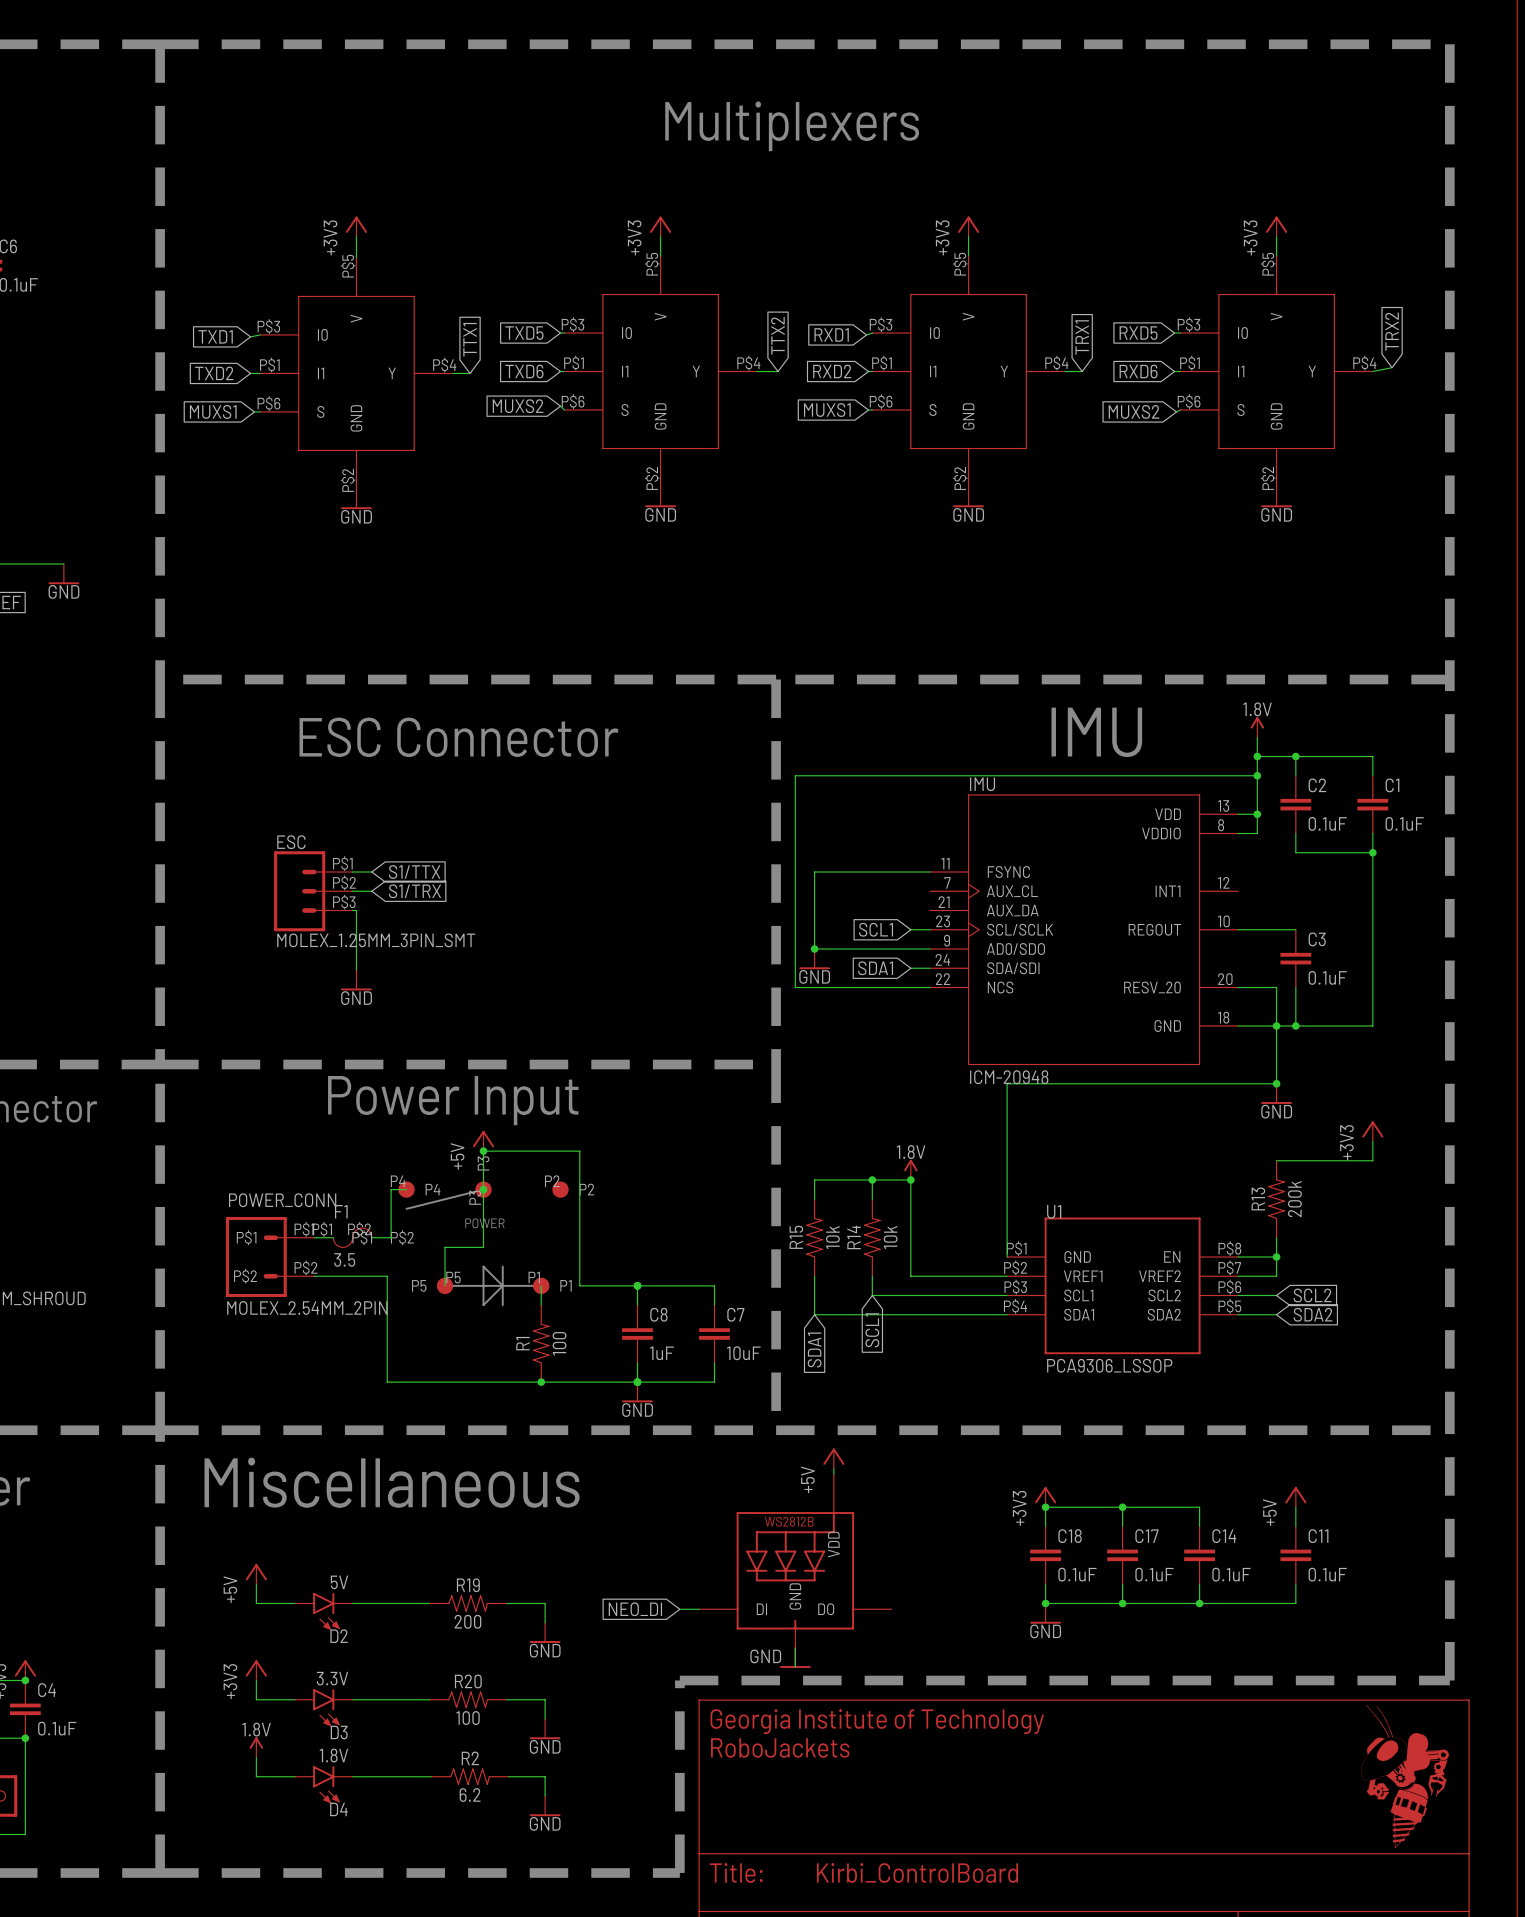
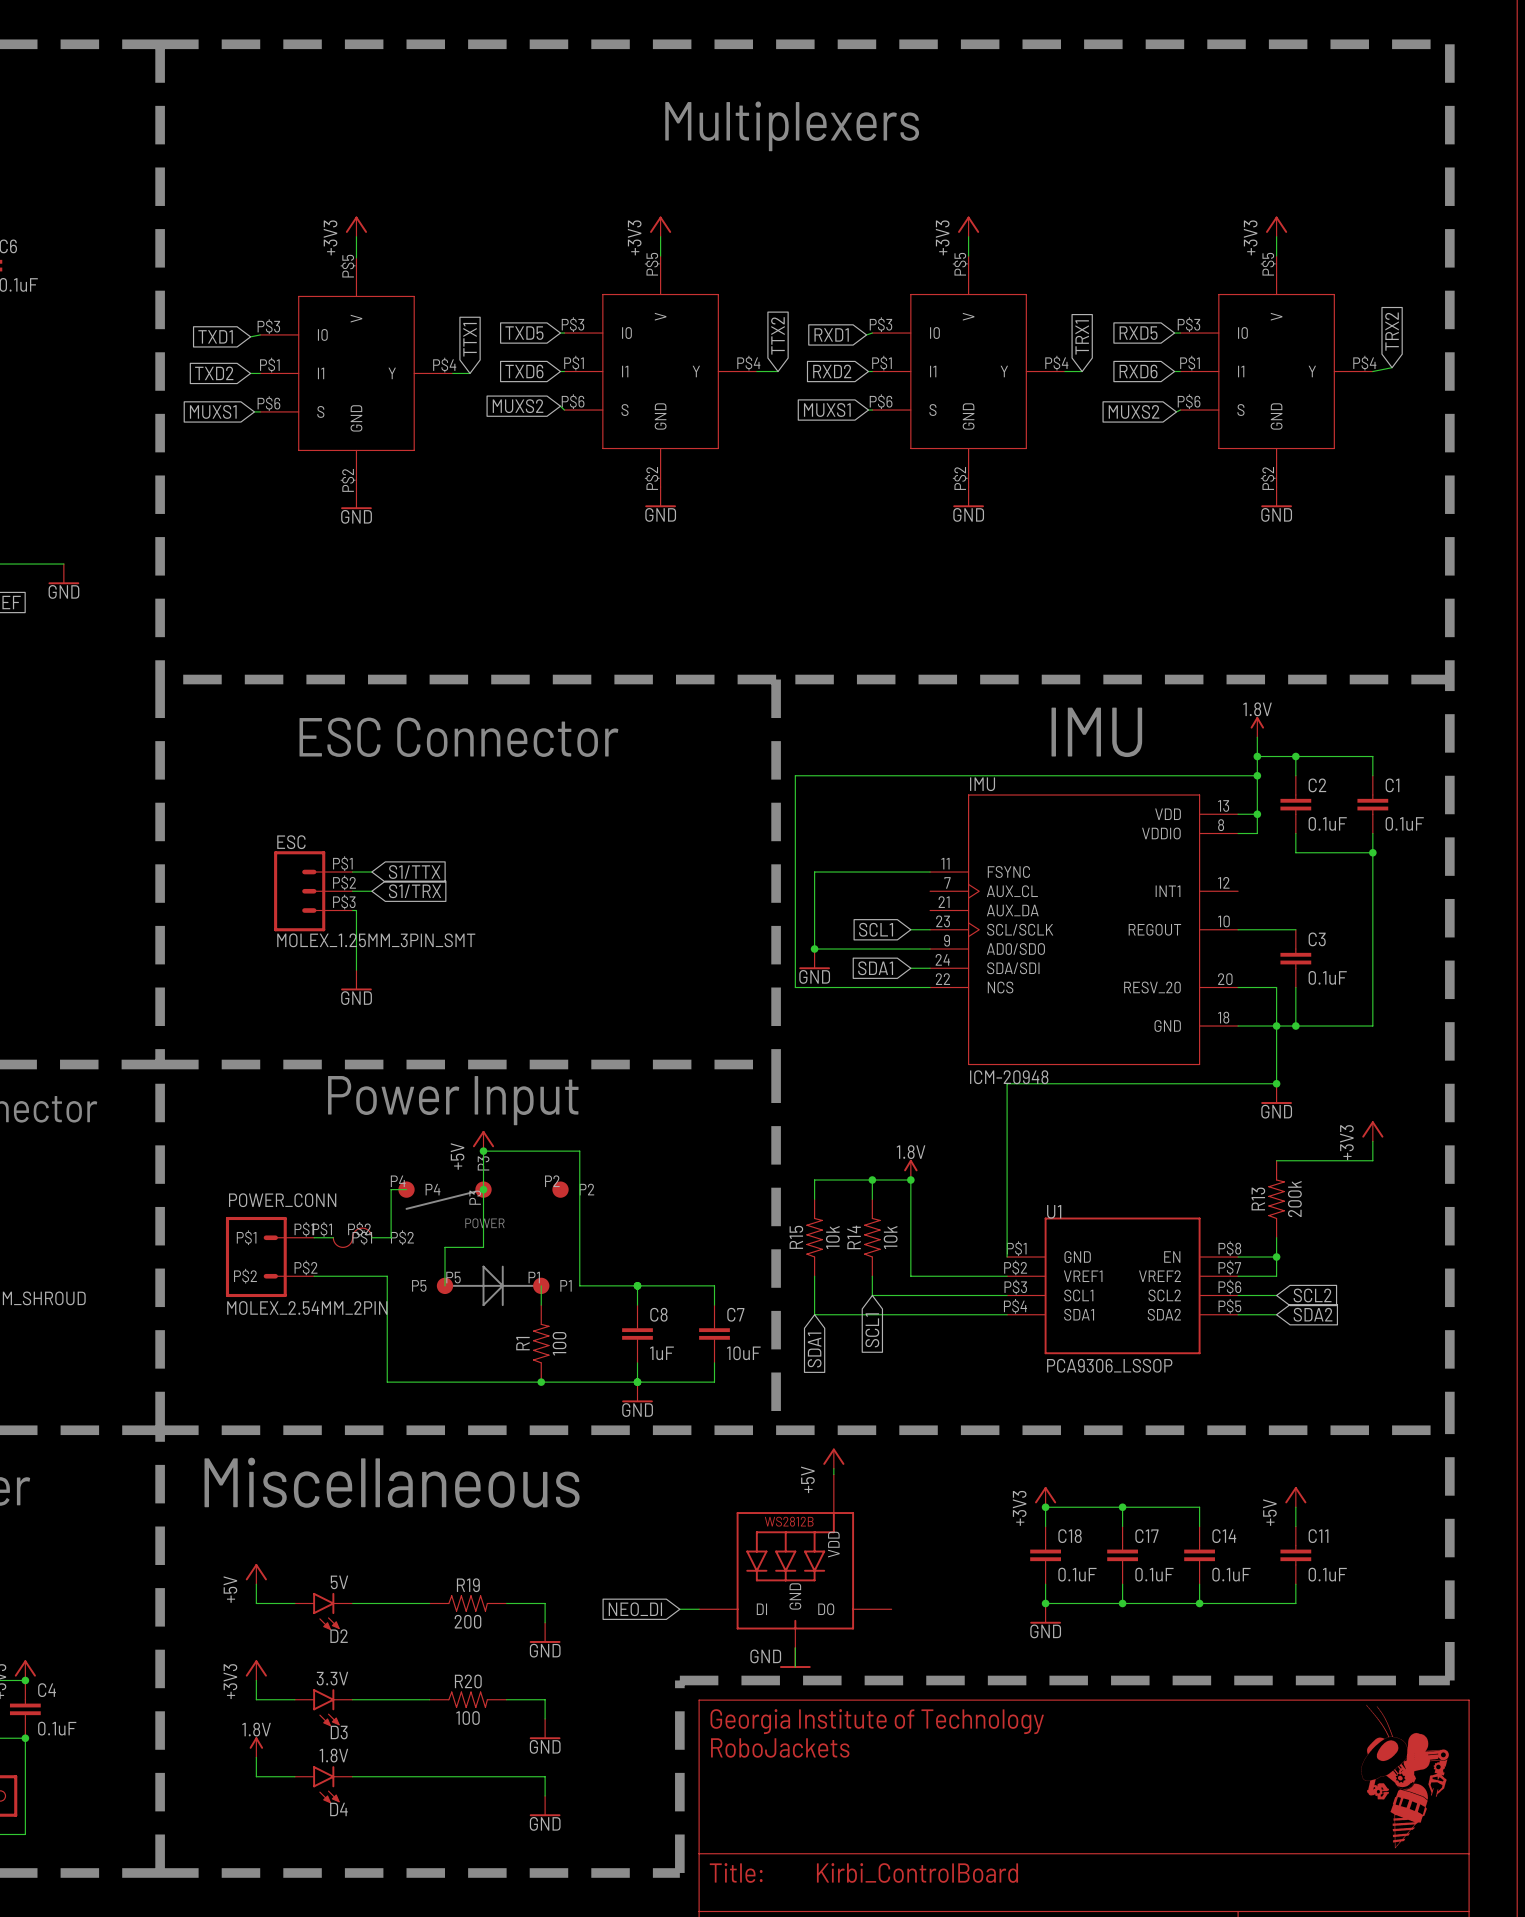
F1 name: F1 (341, 1211) -> none
F1 value: 3.5 (344, 1259) -> none
R2: 6.2 (470, 1776) -> none

